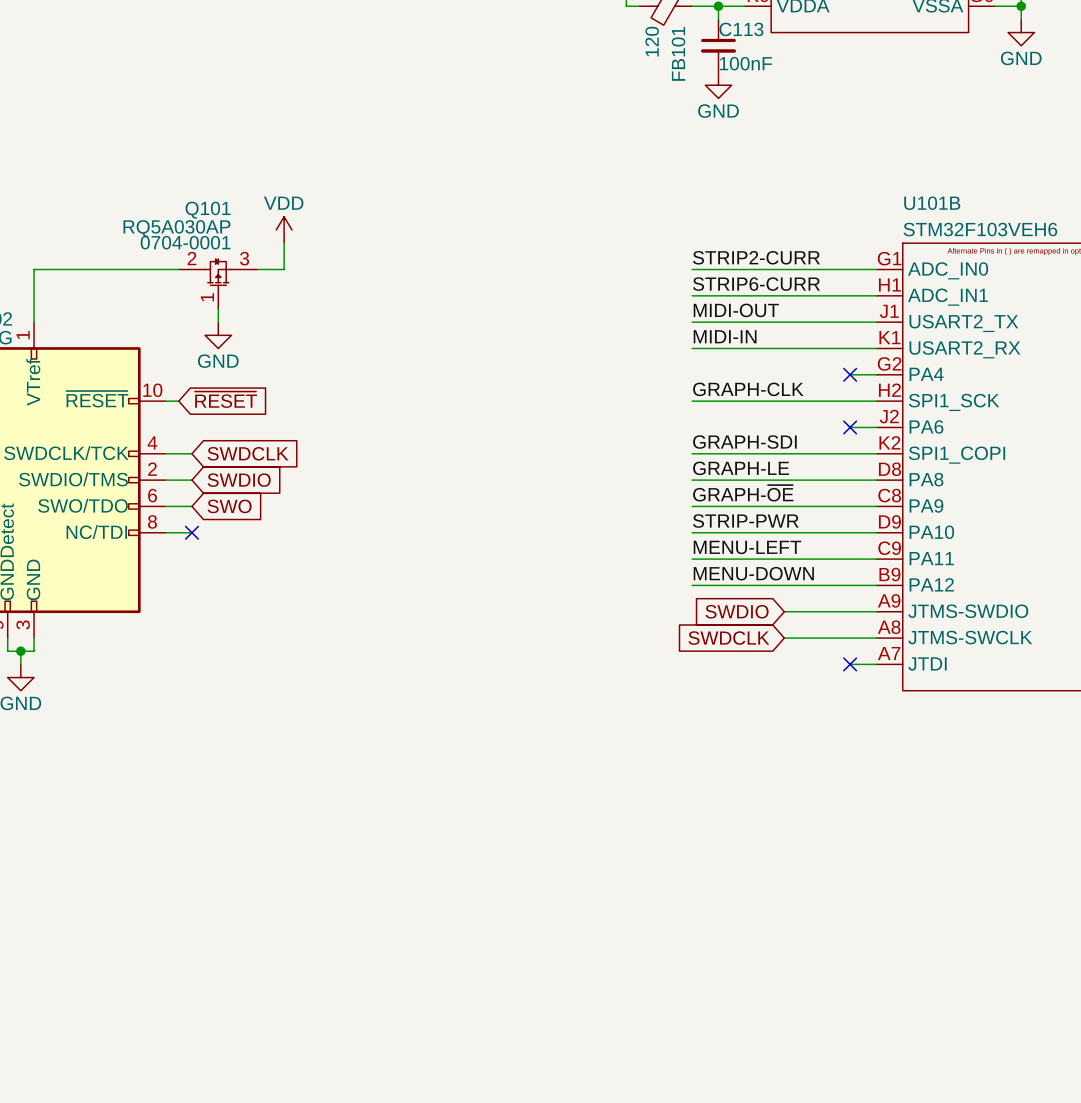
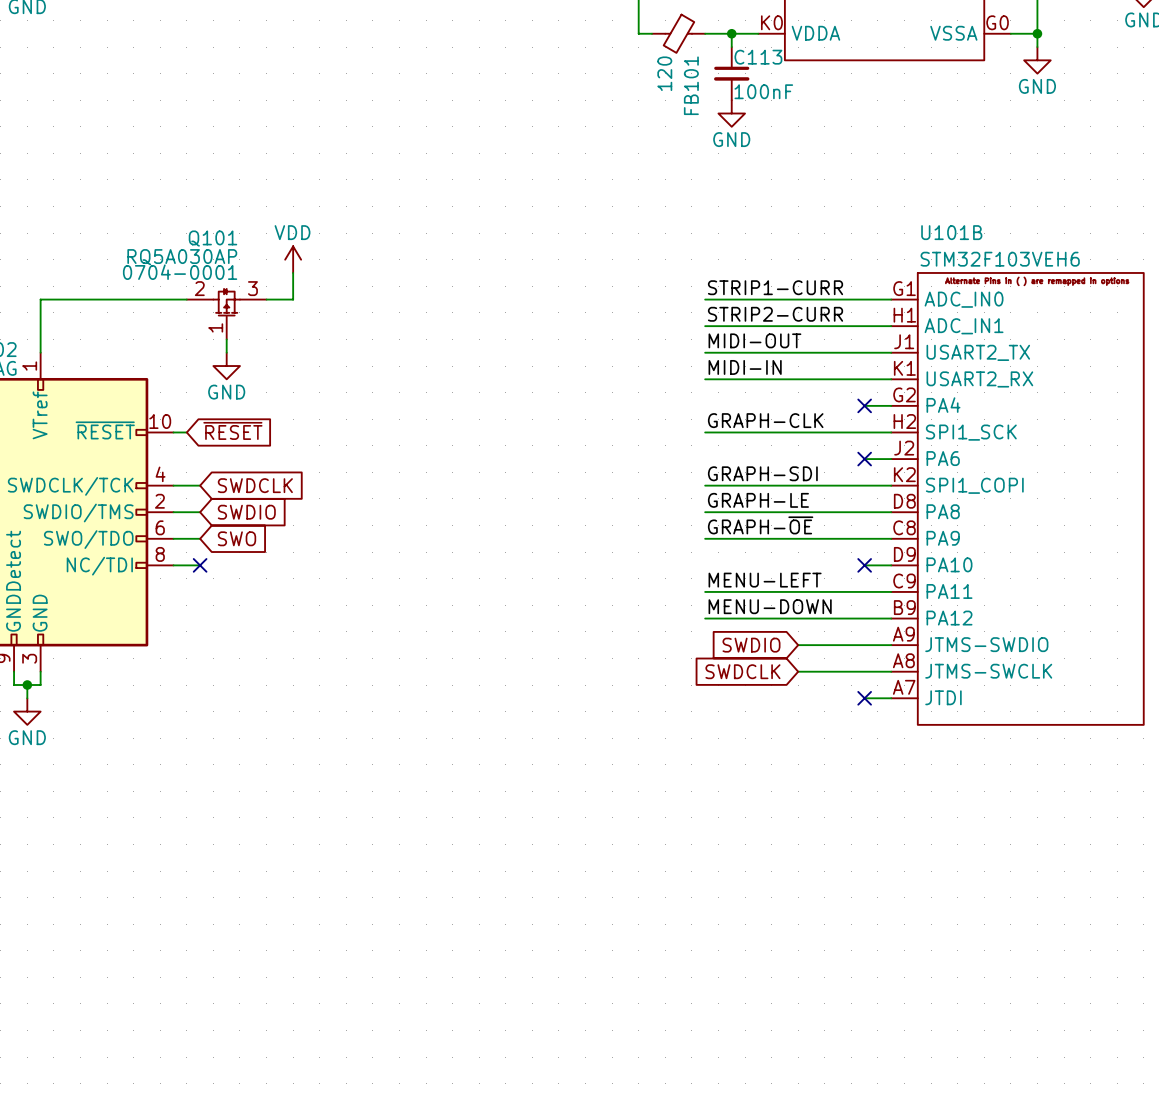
label: STRIP2-CURR (756, 257) -> STRIP1-CURR (775, 287)
label: STRIP6-CURR (756, 284) -> STRIP2-CURR (775, 314)
label: STRIP-PWR (745, 521) -> none
wire: (692, 532) (850, 532) -> none
no-connect mark: none -> (864, 565)

